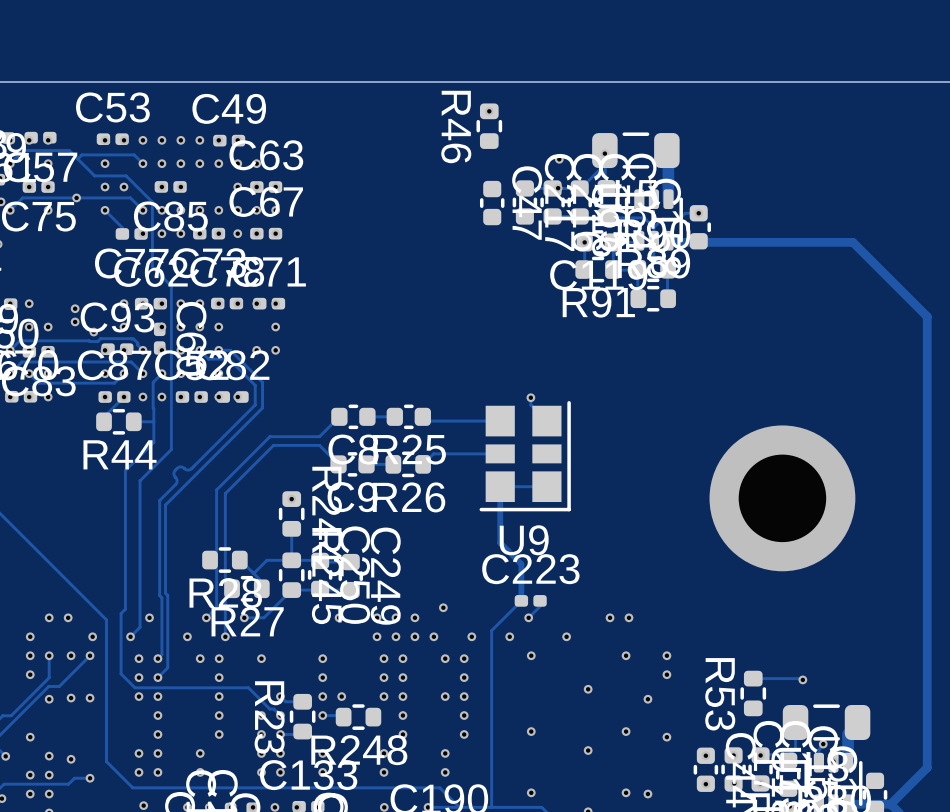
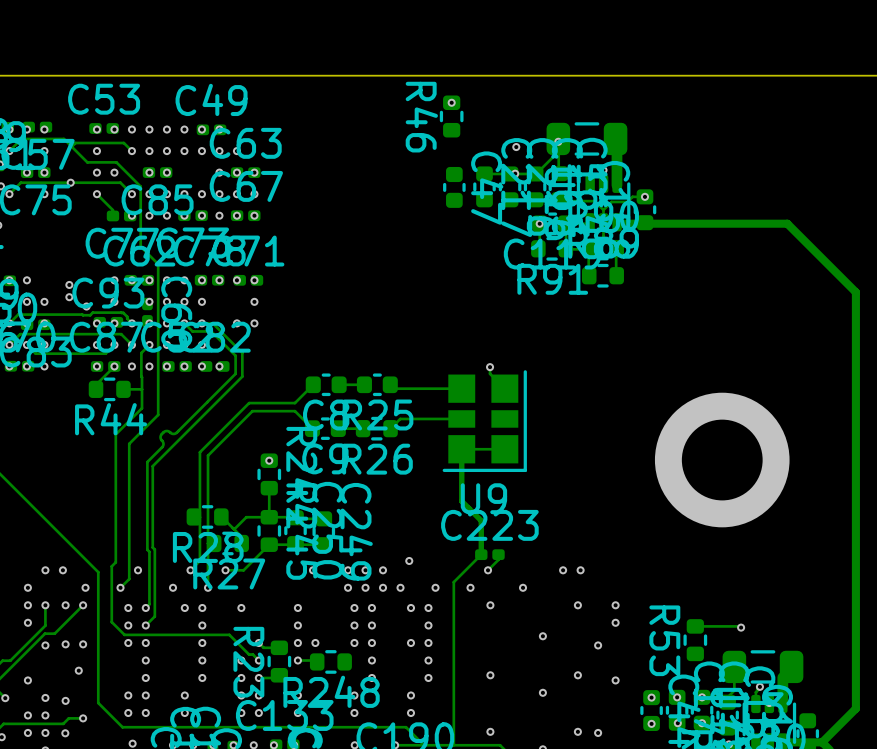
via: none -> (78, 670)
via: none -> (65, 733)

